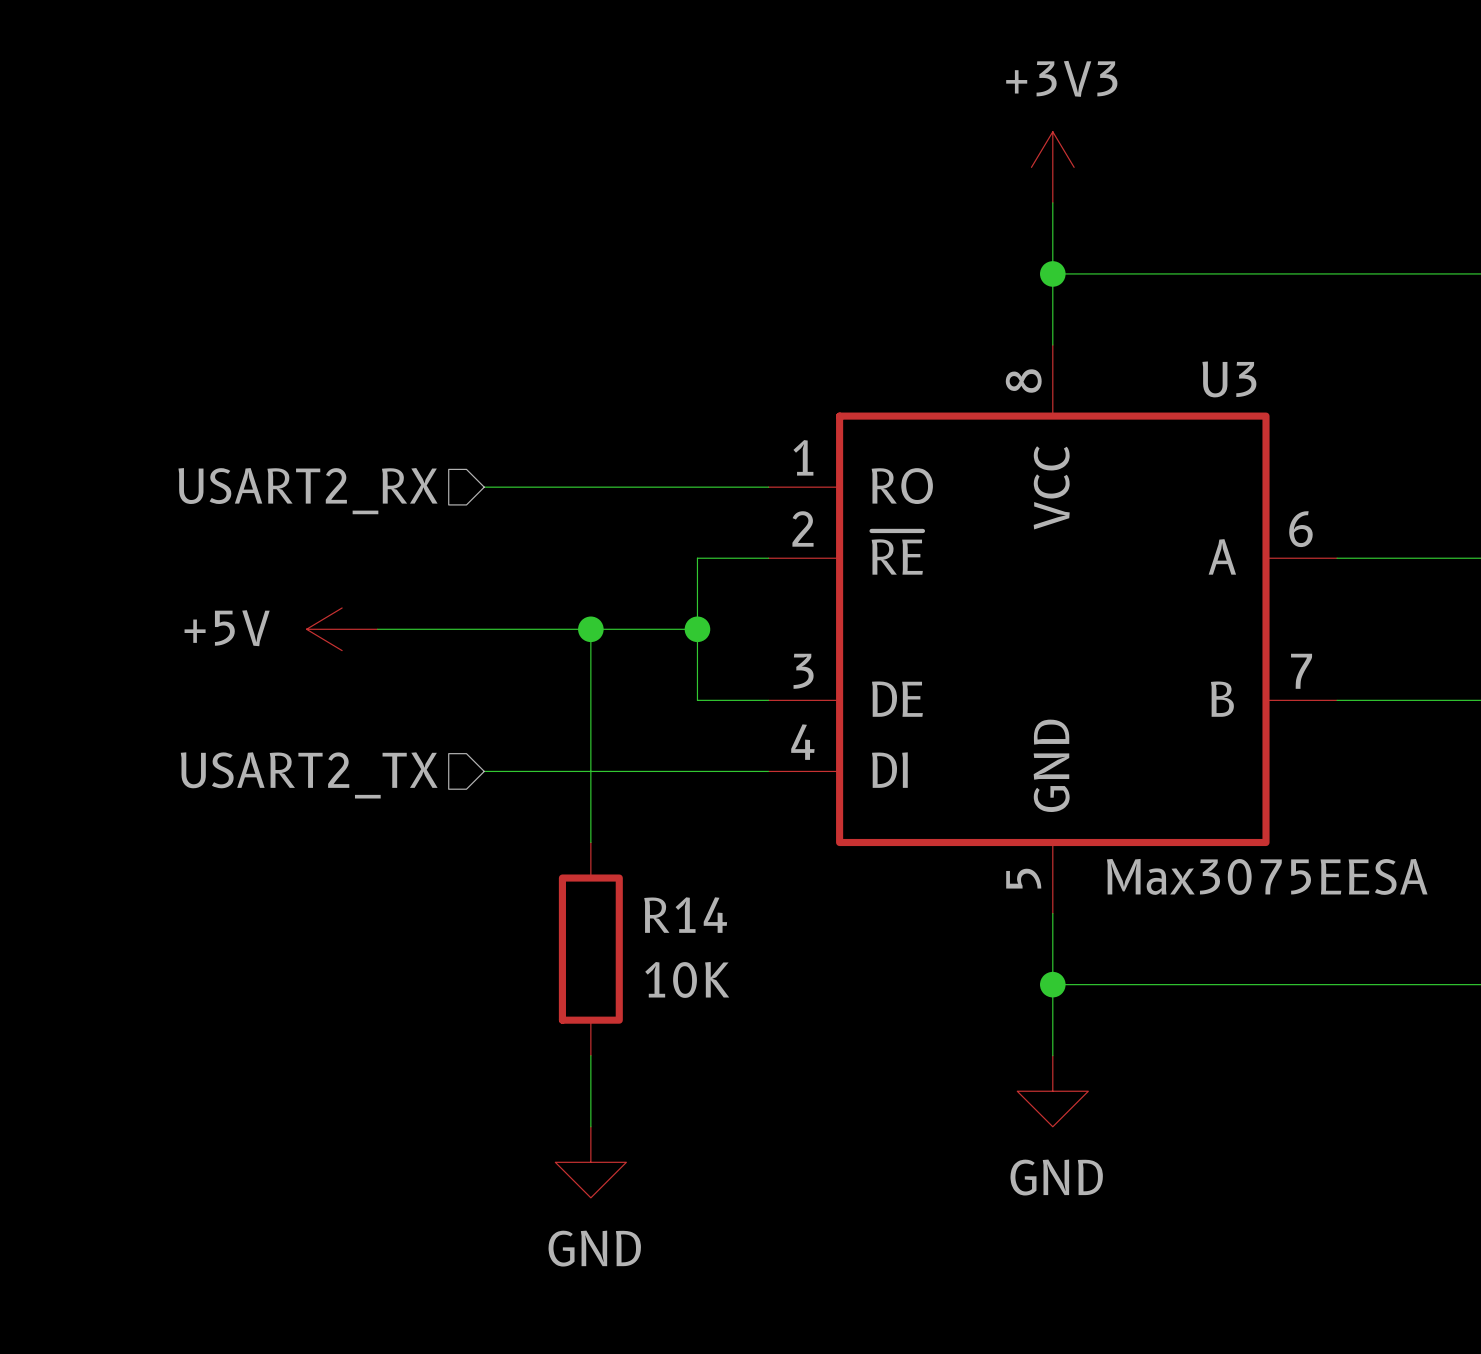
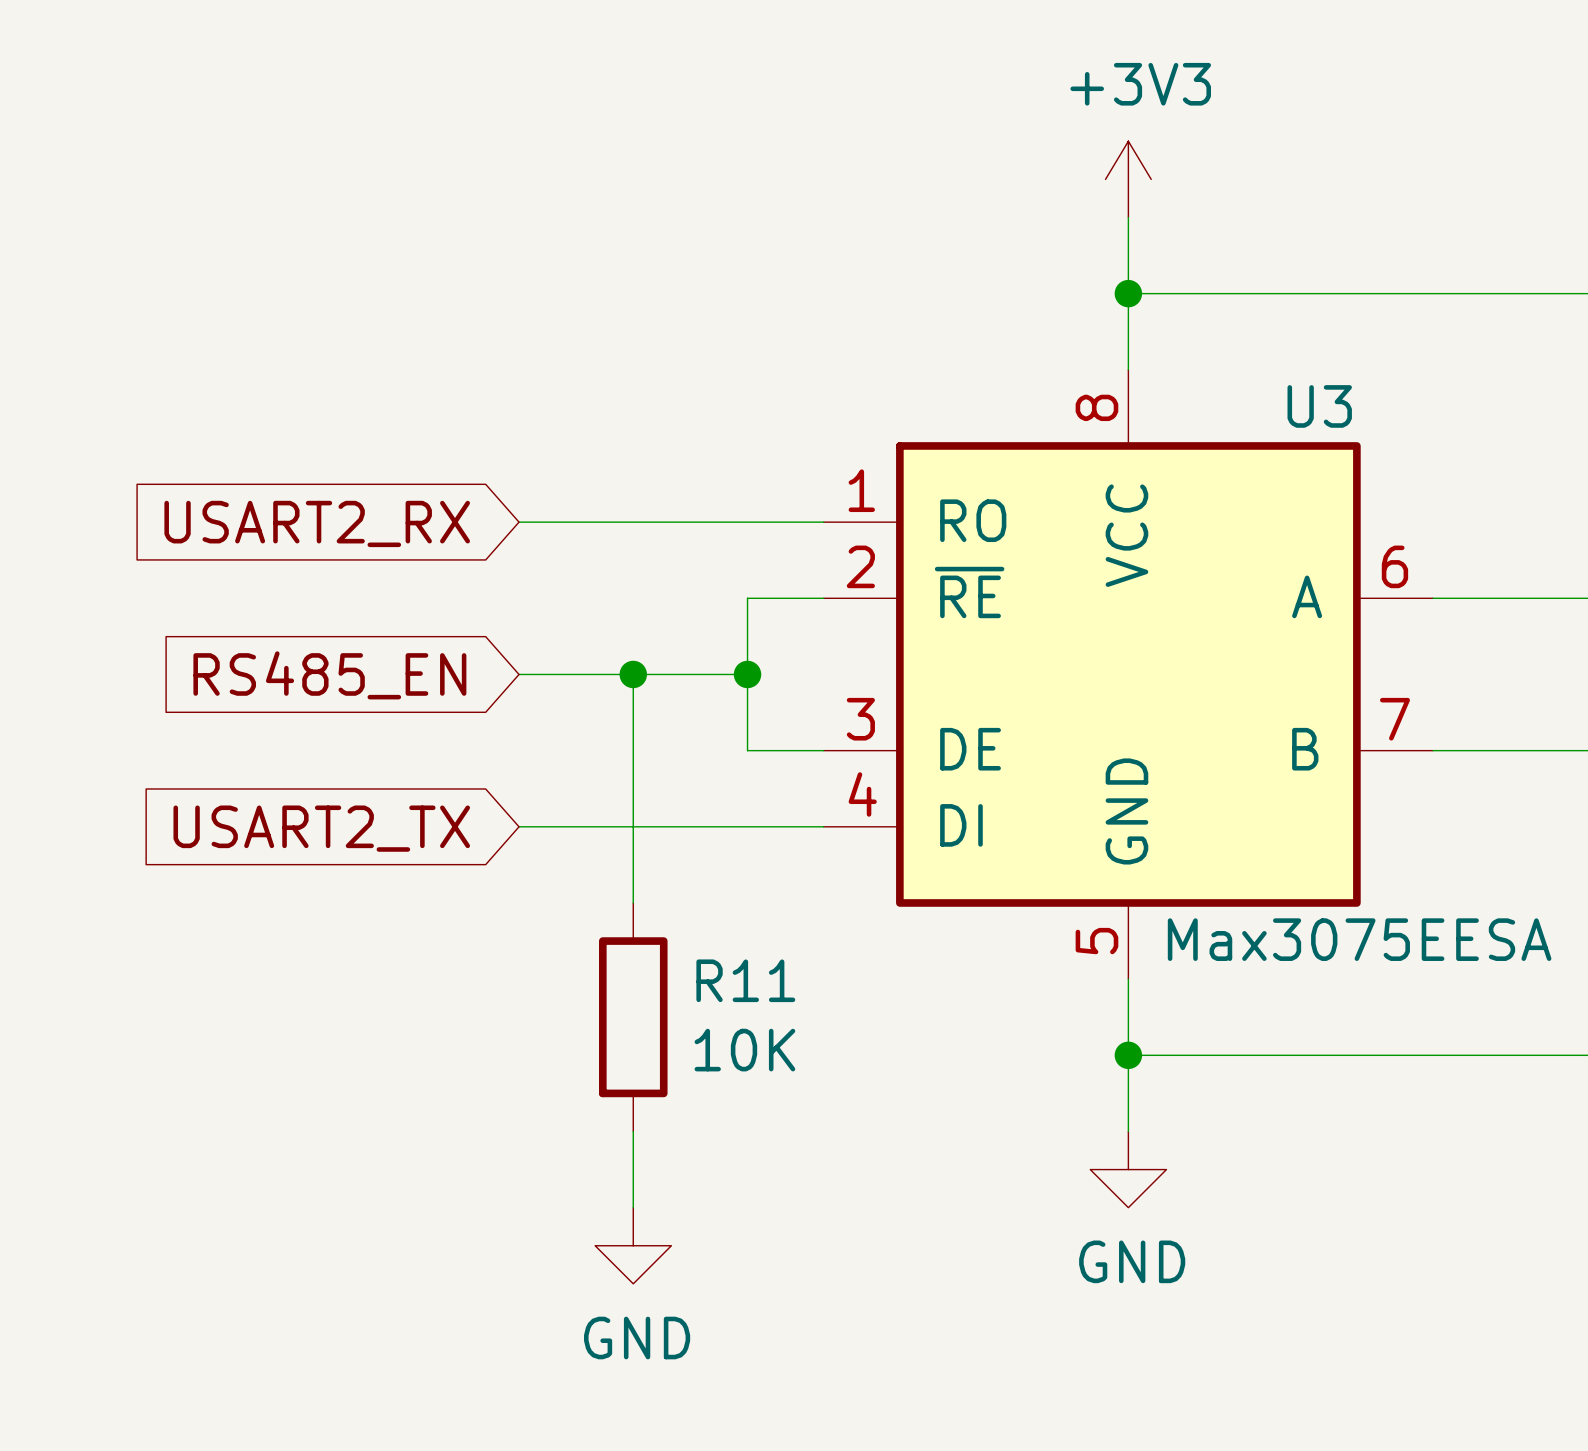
hierarchical label: USART2_RX (308, 491) -> none
global label: none -> USART2_RX (317, 523)
power symbol: +5V (342, 629) -> none
wire: (377, 629) (484, 629) -> none
global label: none -> RS485_EN (329, 675)
hierarchical label: USART2_TX (309, 775) -> none
global label: none -> USART2_TX (321, 828)
R14 name: R14 (685, 915) -> R11 (745, 980)

